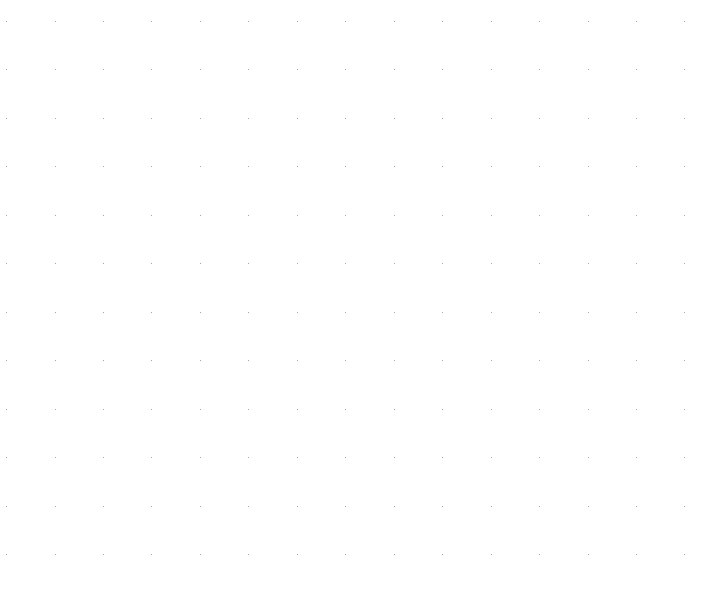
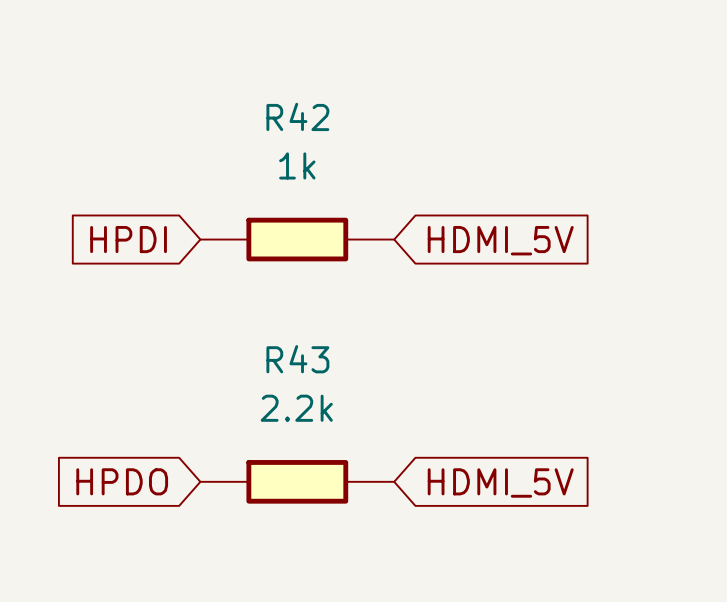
global label: none -> HPDI (128, 239)
R42: none -> 1k (297, 239)
global label: none -> HDMI_5V (500, 240)
global label: none -> HPDO (122, 481)
R43: none -> 2.2k (297, 481)
global label: none -> HDMI_5V (500, 482)

